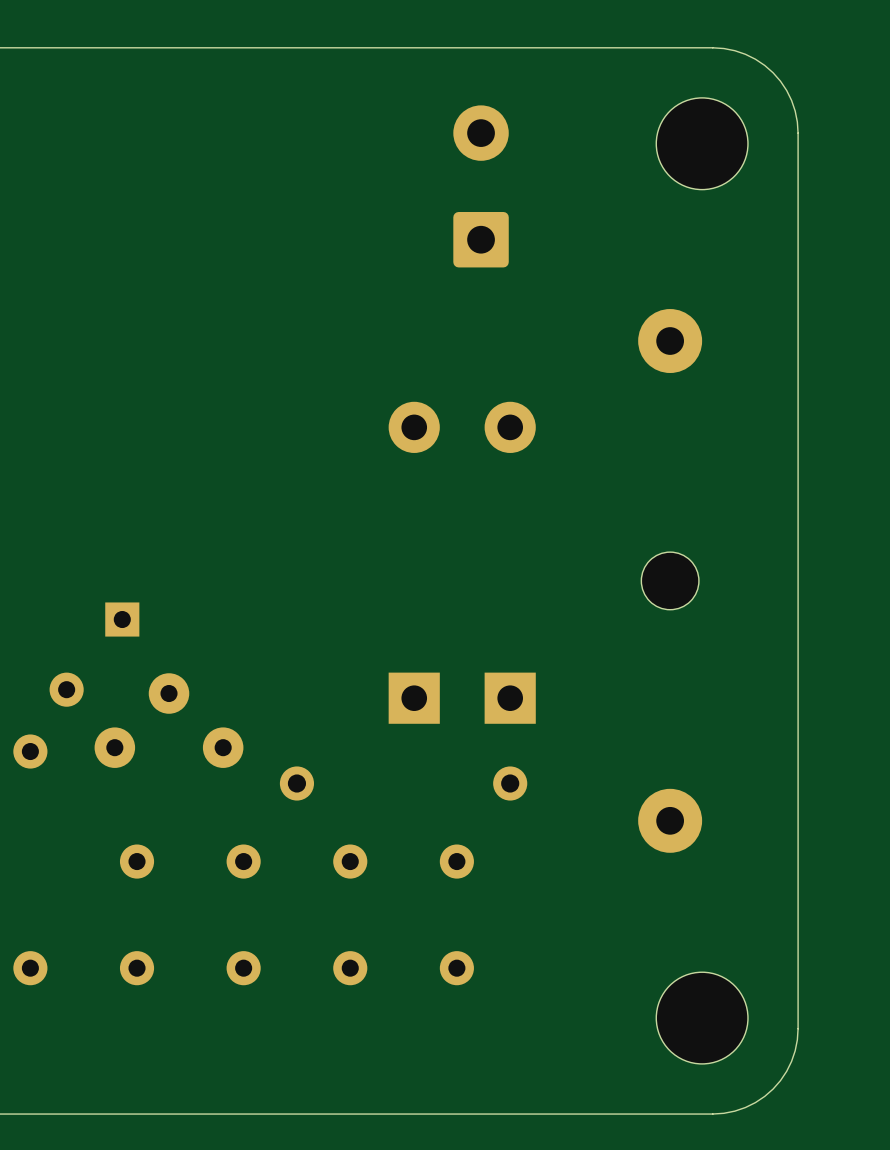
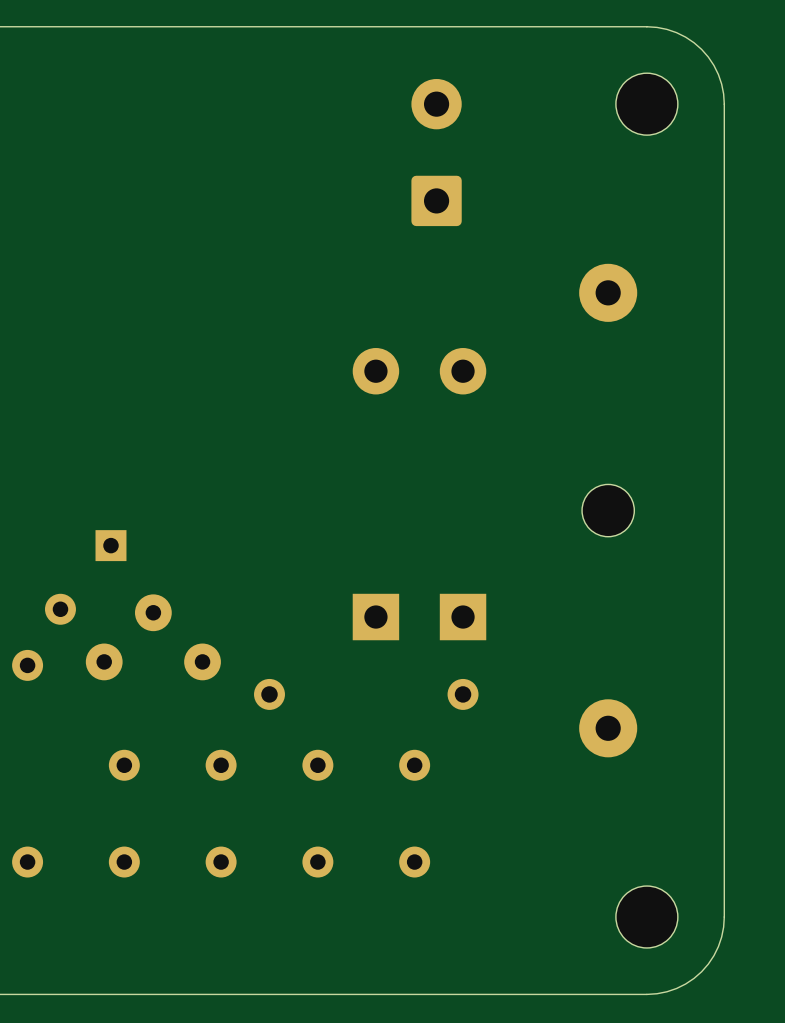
part footprint: [656, 97, 748, 190] -> [615, 73, 678, 136]
part footprint: [656, 972, 748, 1064] -> [615, 886, 678, 948]

